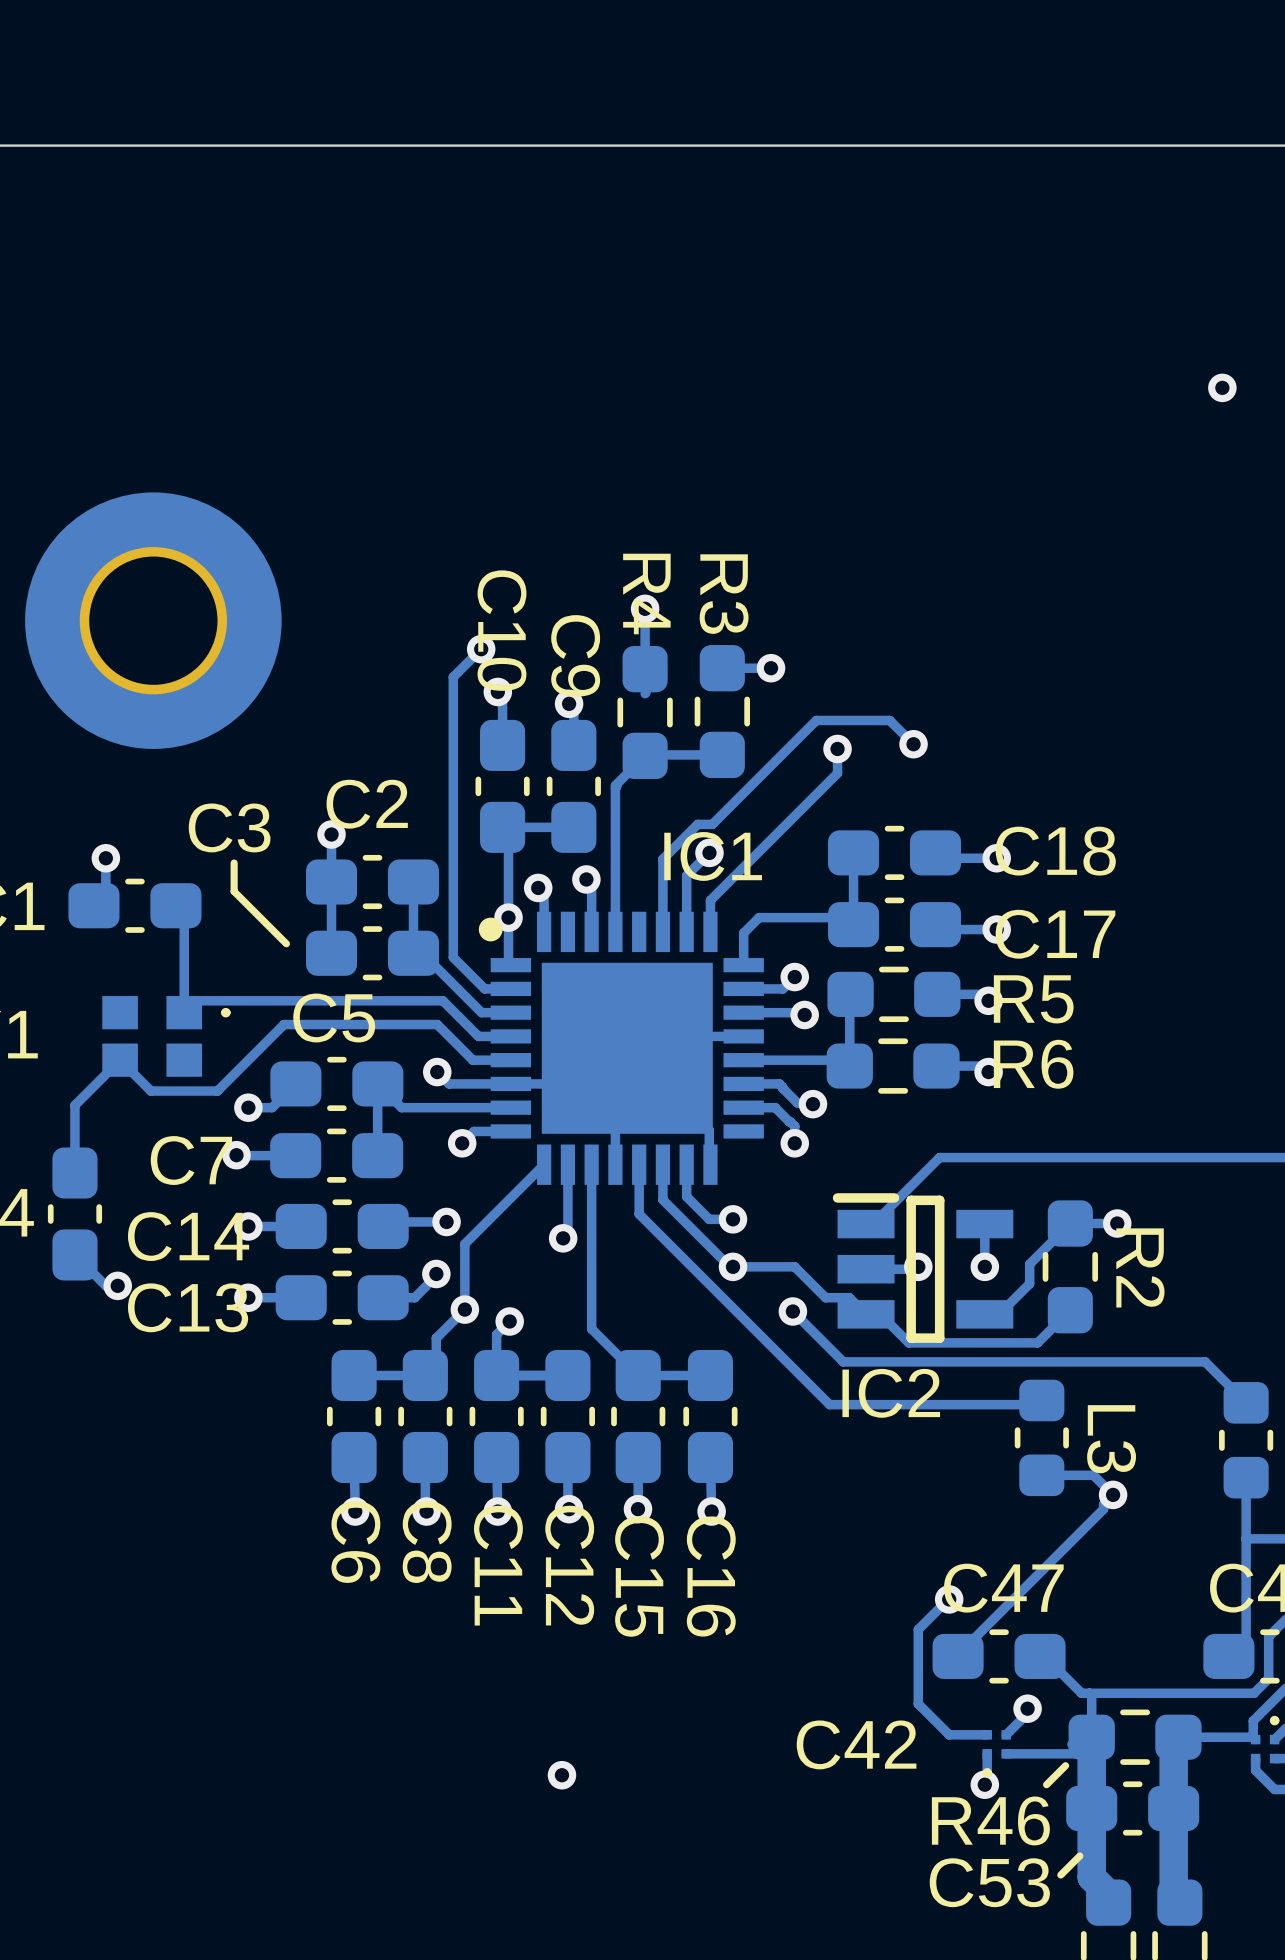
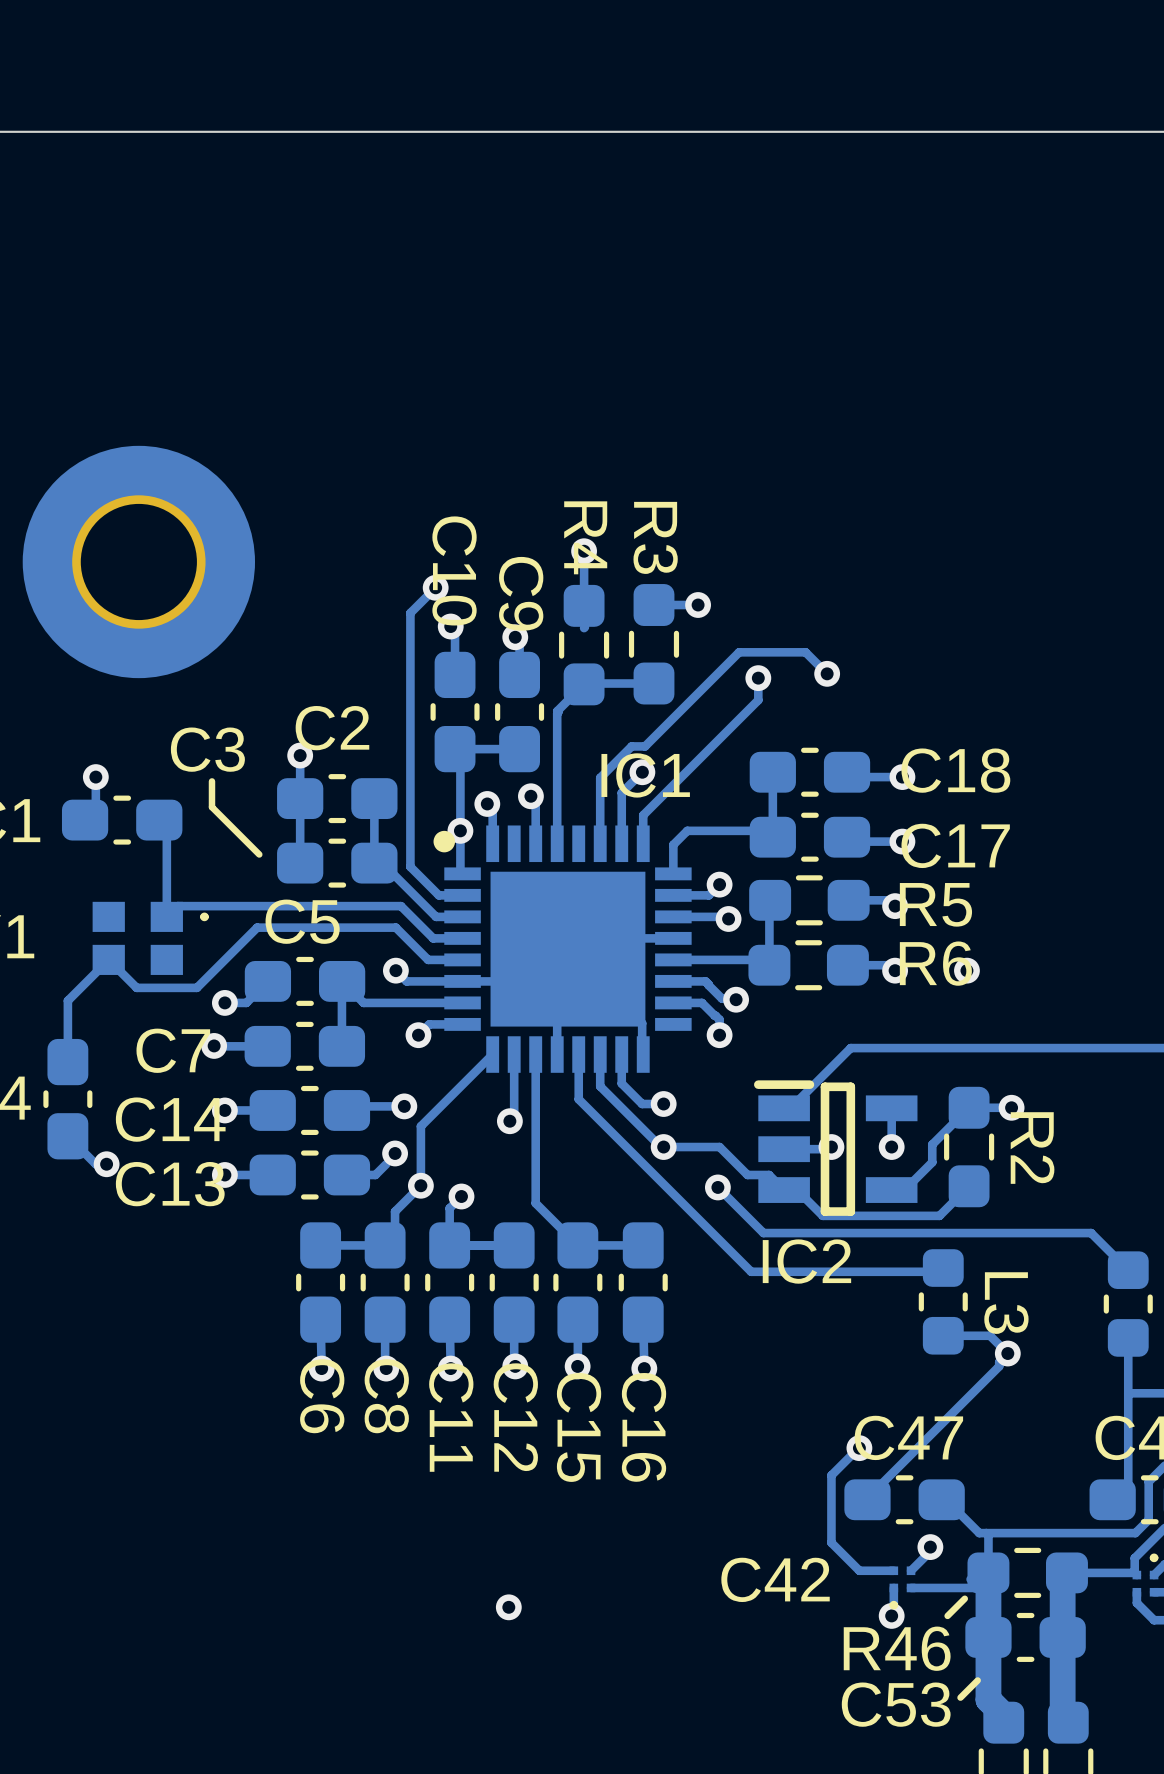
via: (1222, 387) -> none
via: none -> (966, 970)

